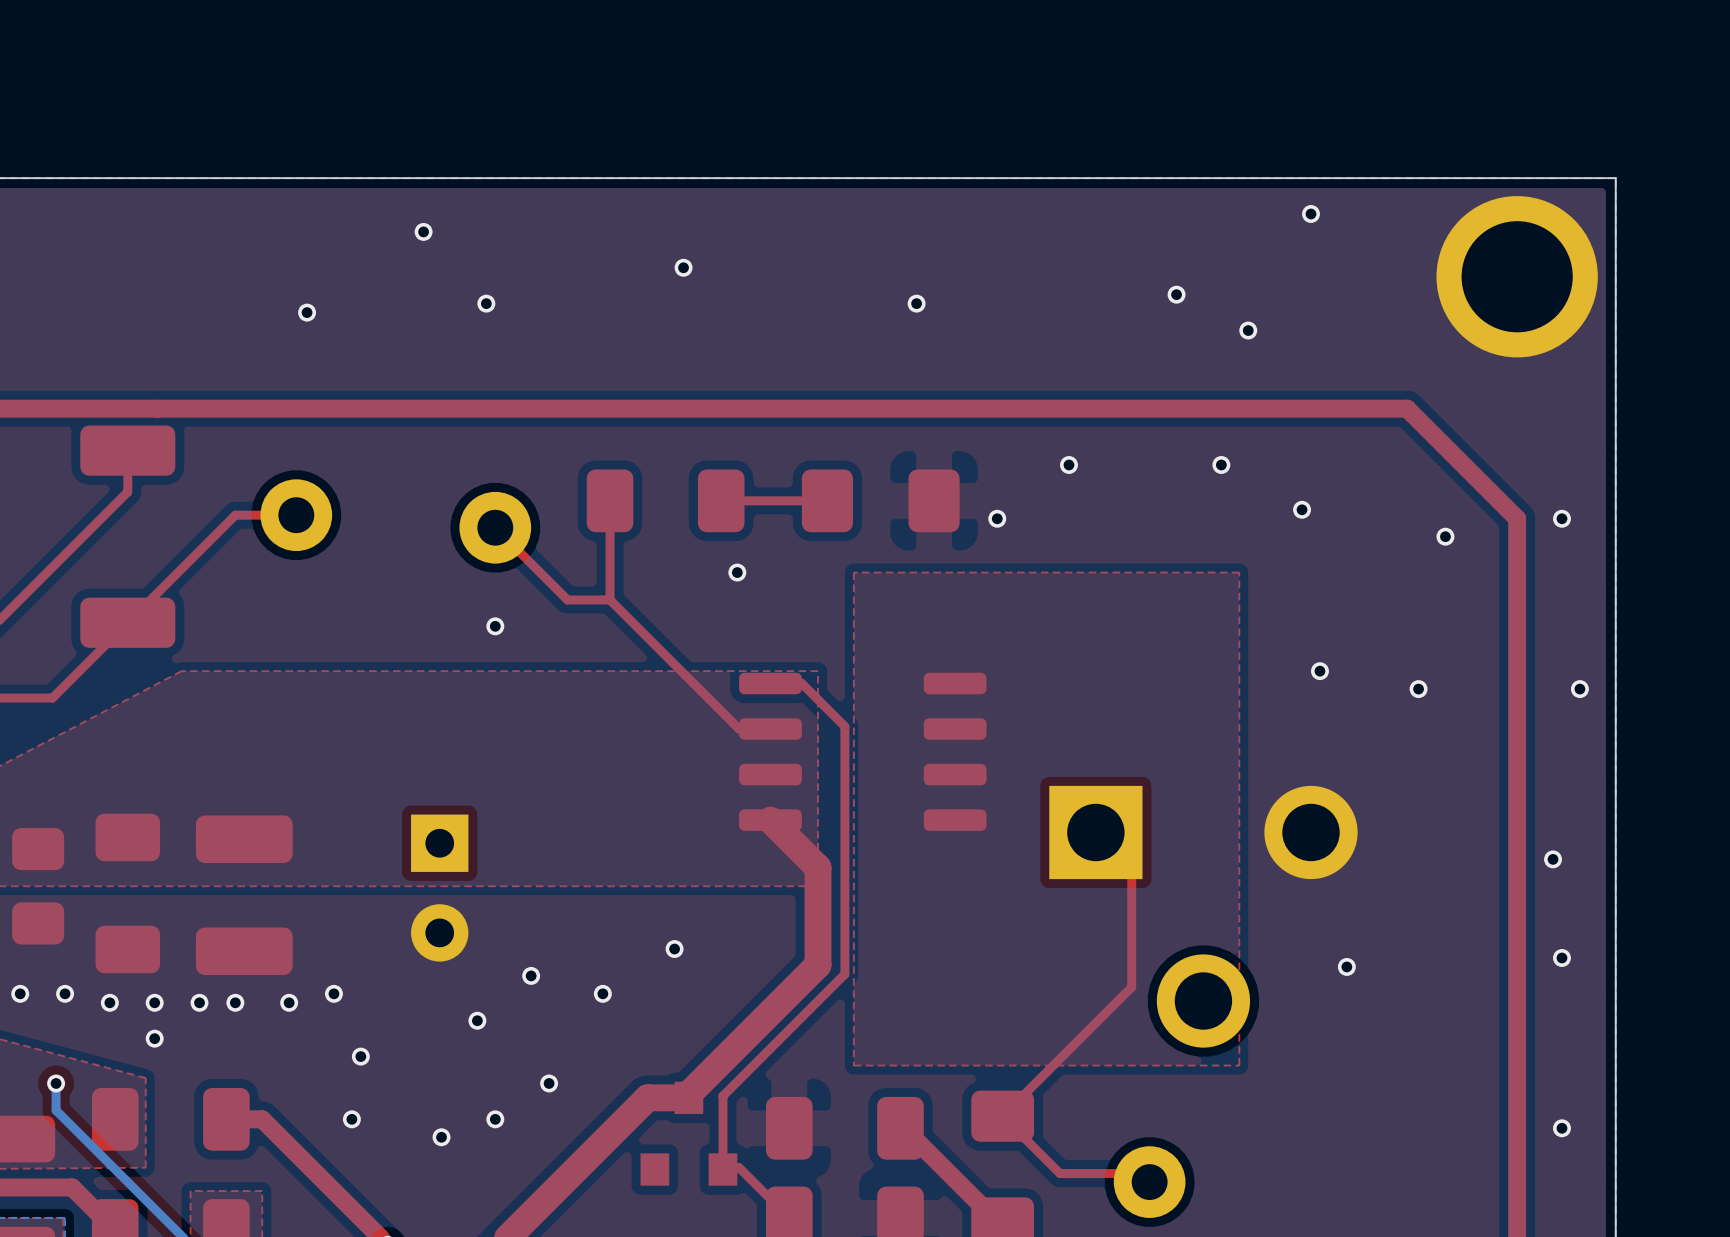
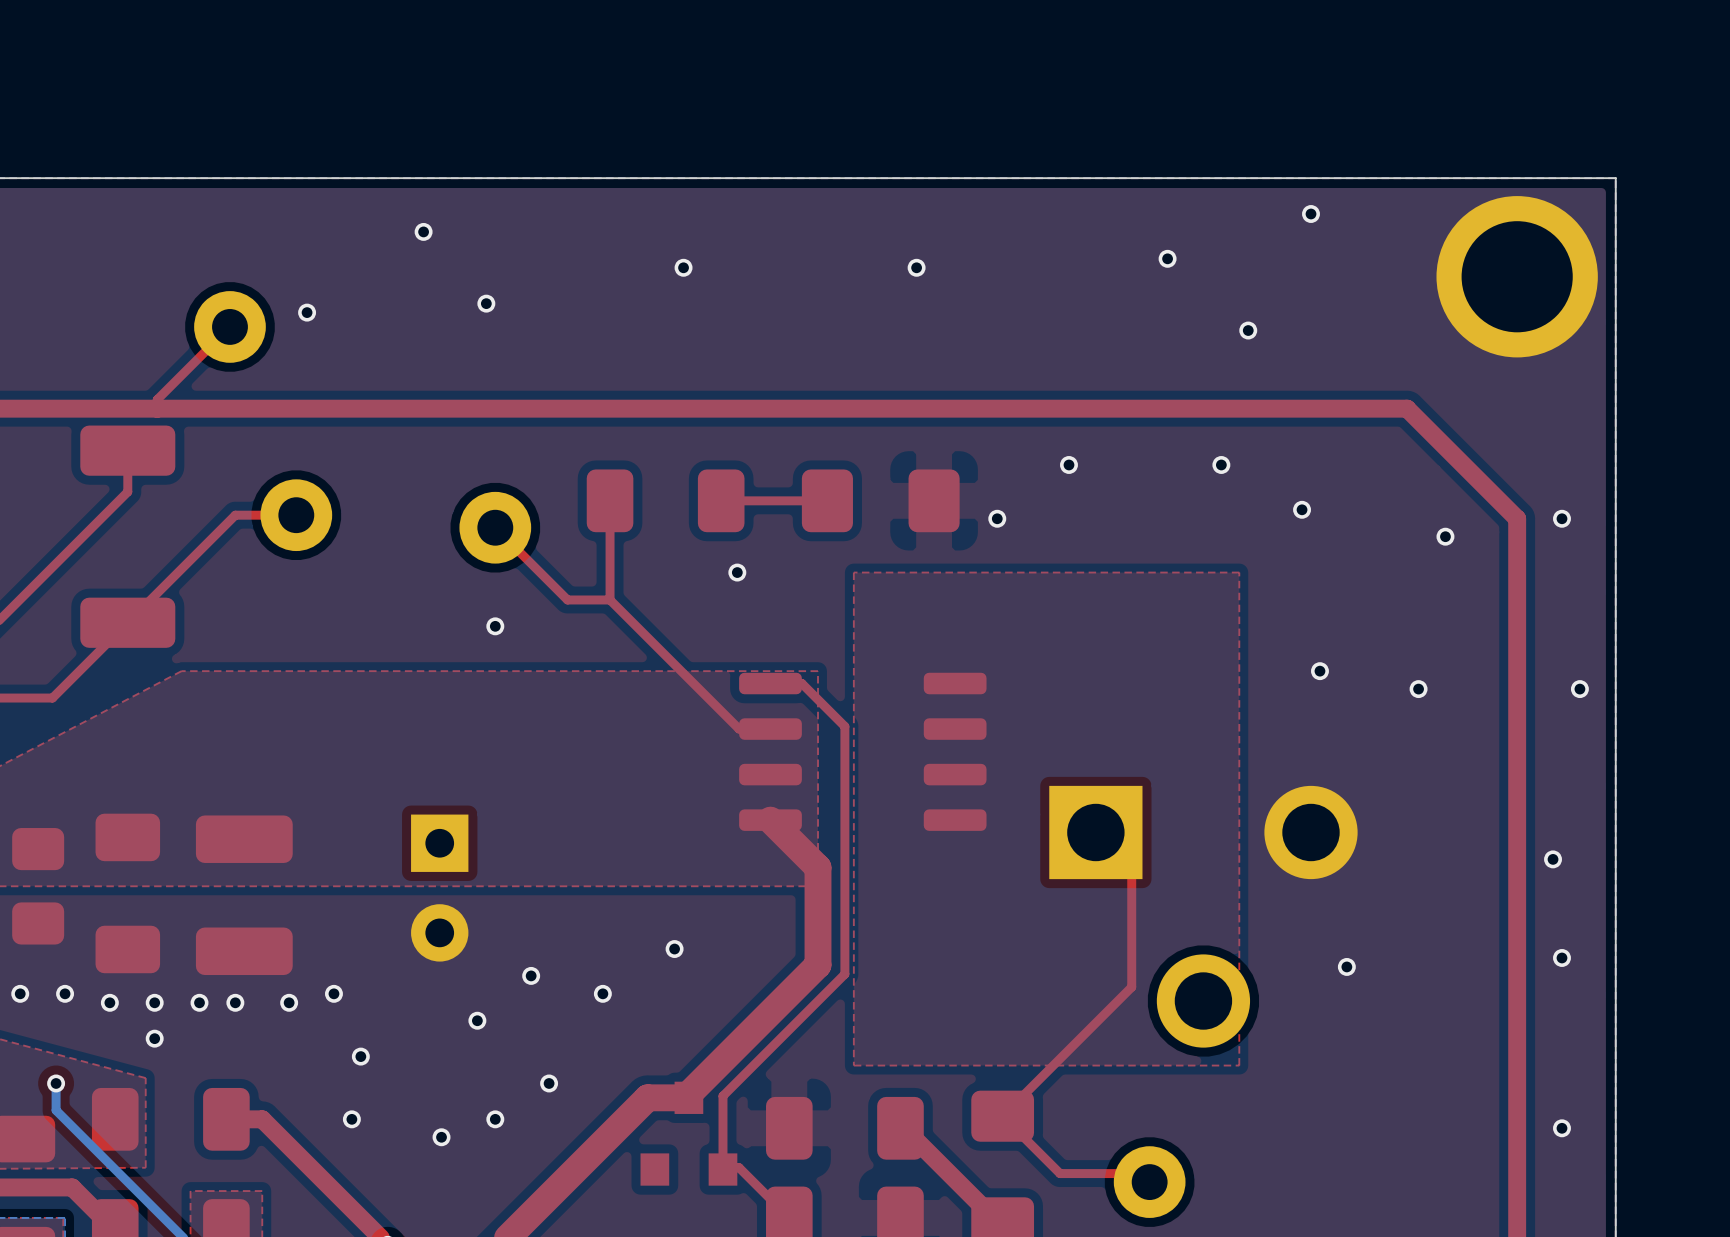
via position: (1176, 294) -> (1167, 258)
via position: (916, 303) -> (916, 267)
top track: none -> (229, 326) (157, 399) (157, 408)
part: none -> (229, 326)

